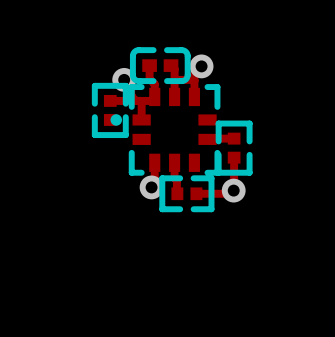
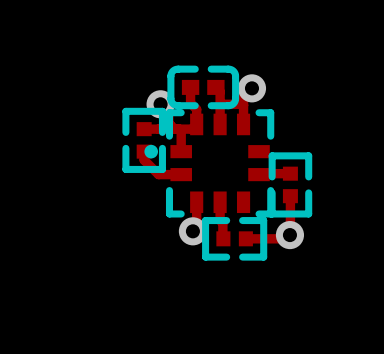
top track: none -> (144, 151) (144, 160) (158, 174) (181, 174)

